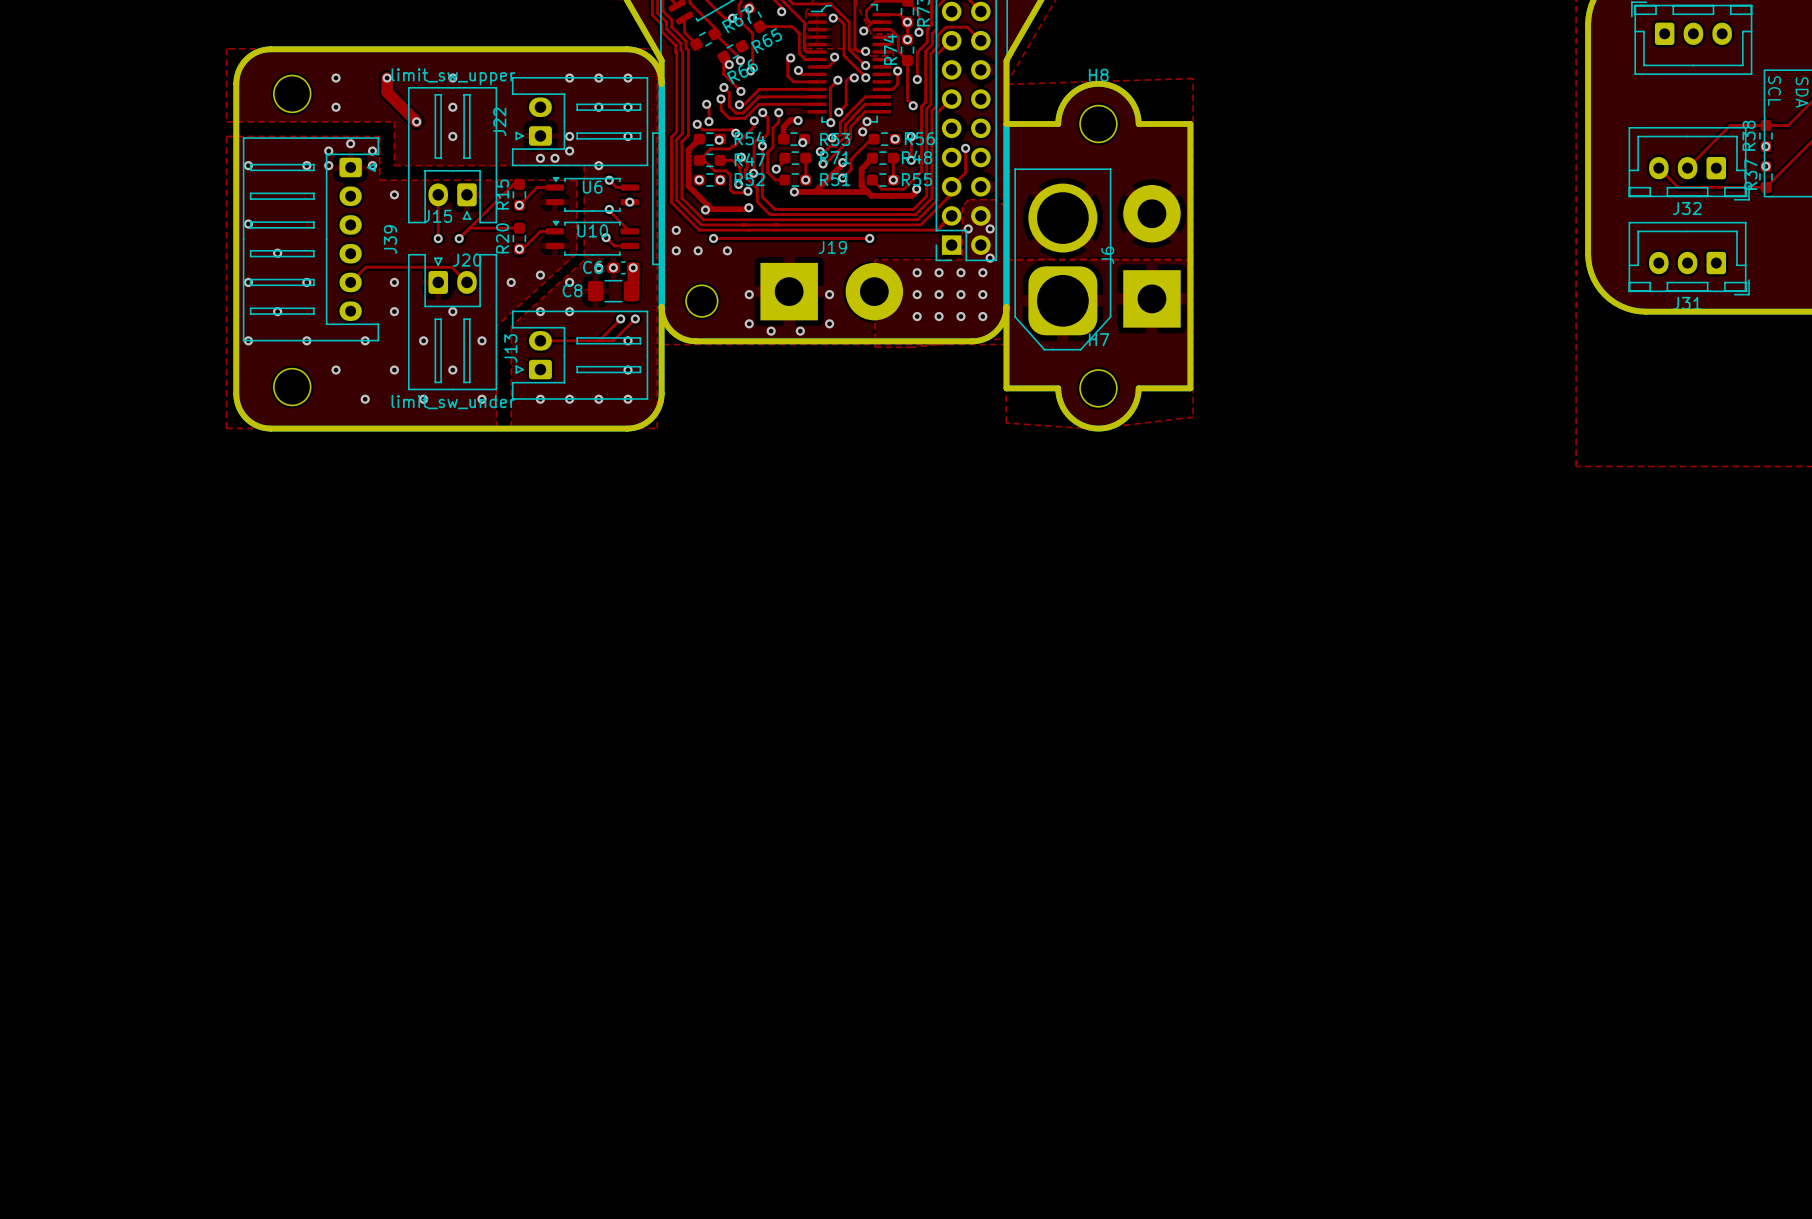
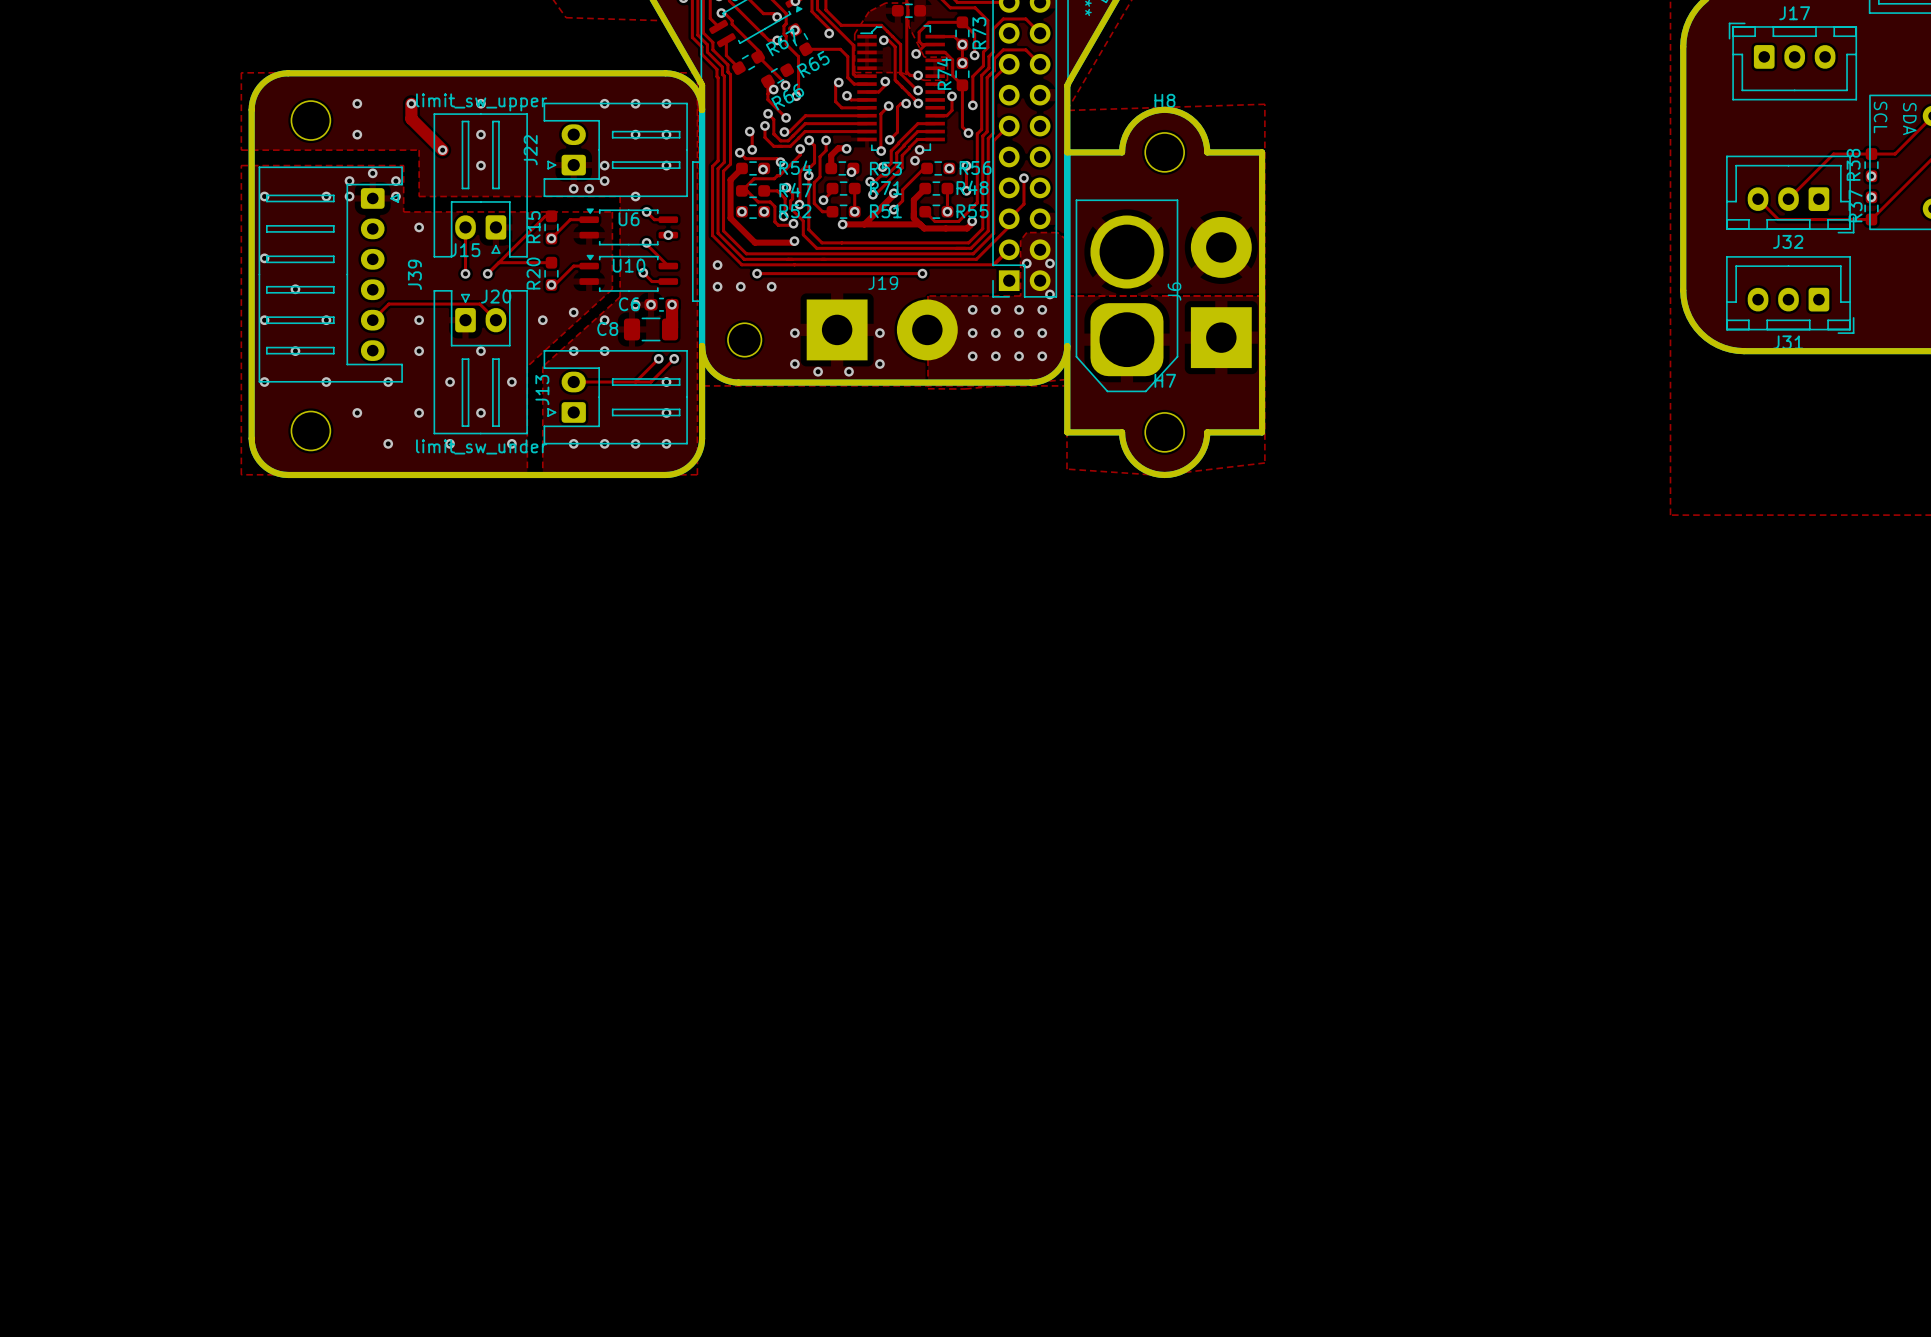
via: (705, 209) -> none

